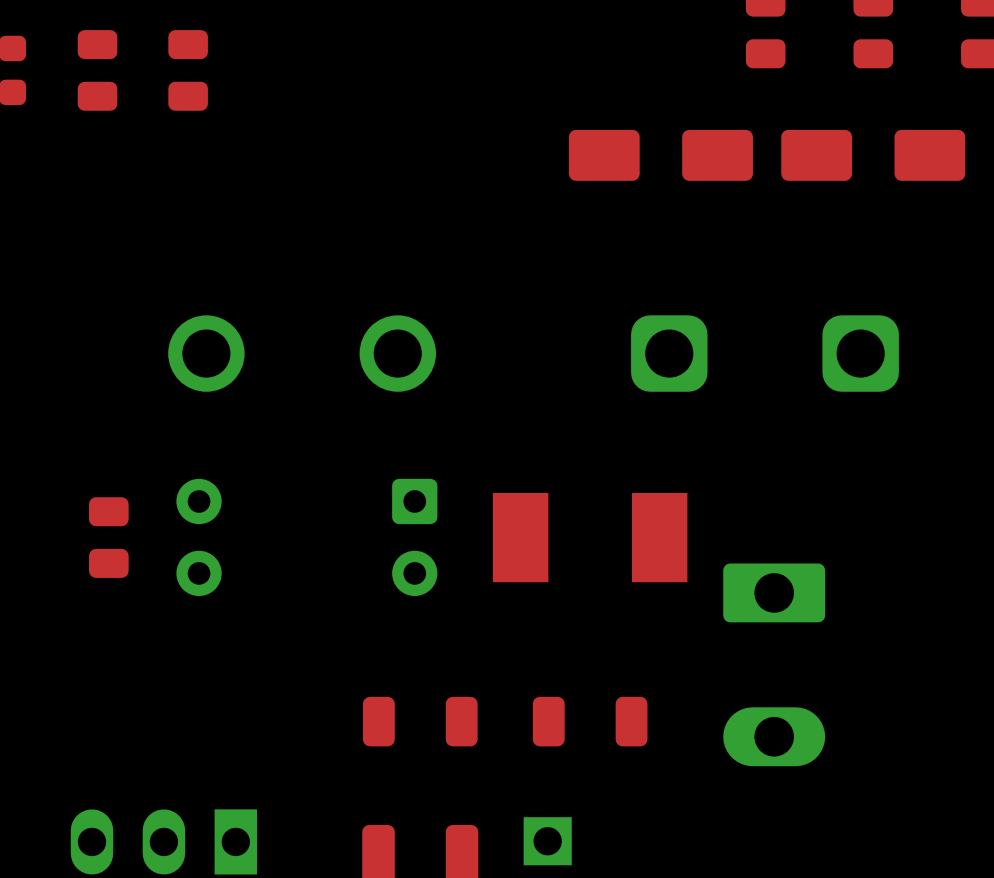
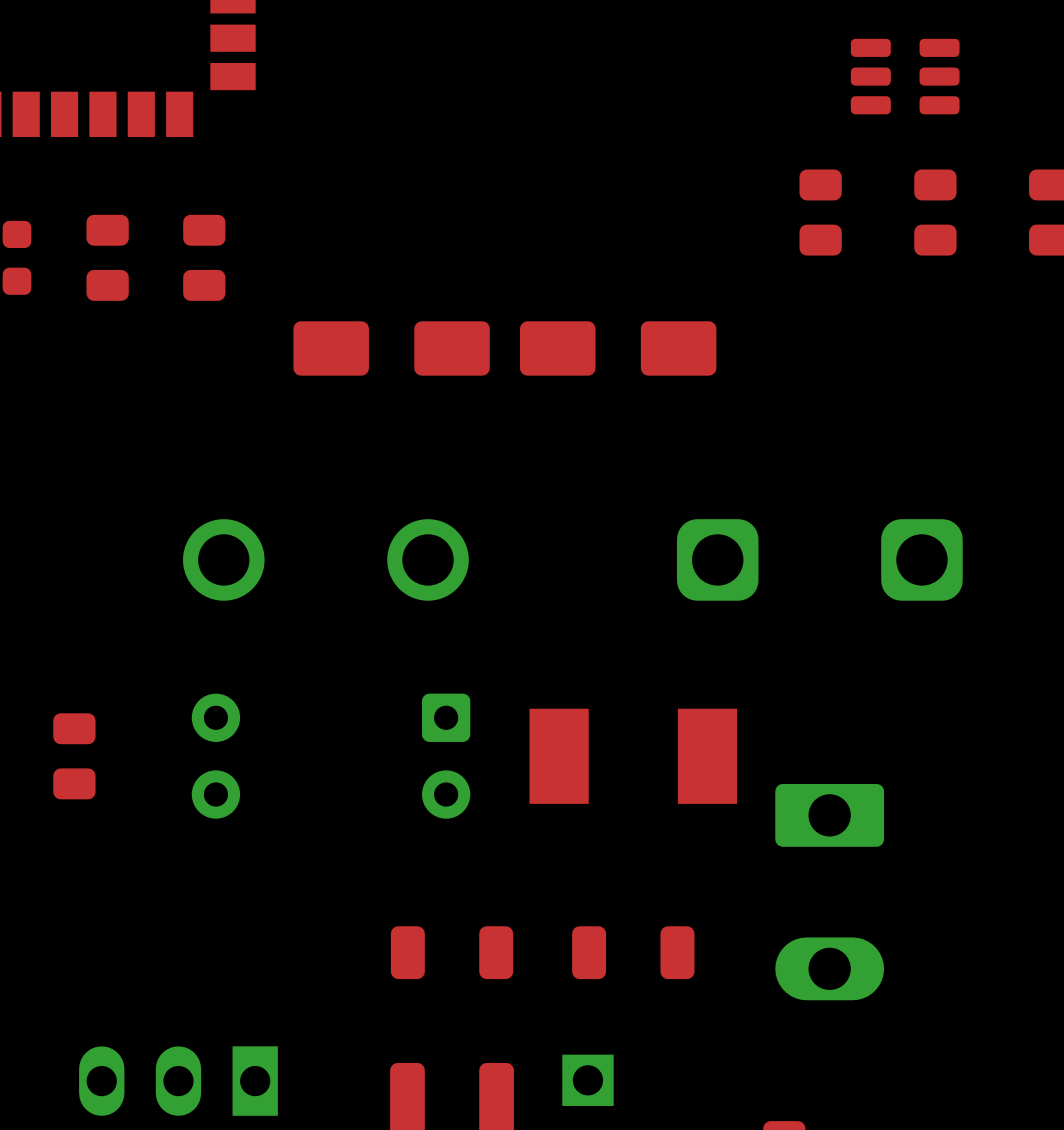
part: none -> (391, 348)
part position: (660, 155) -> (618, 348)
part: (873, 155) -> none
part position: (108, 537) -> (74, 756)

